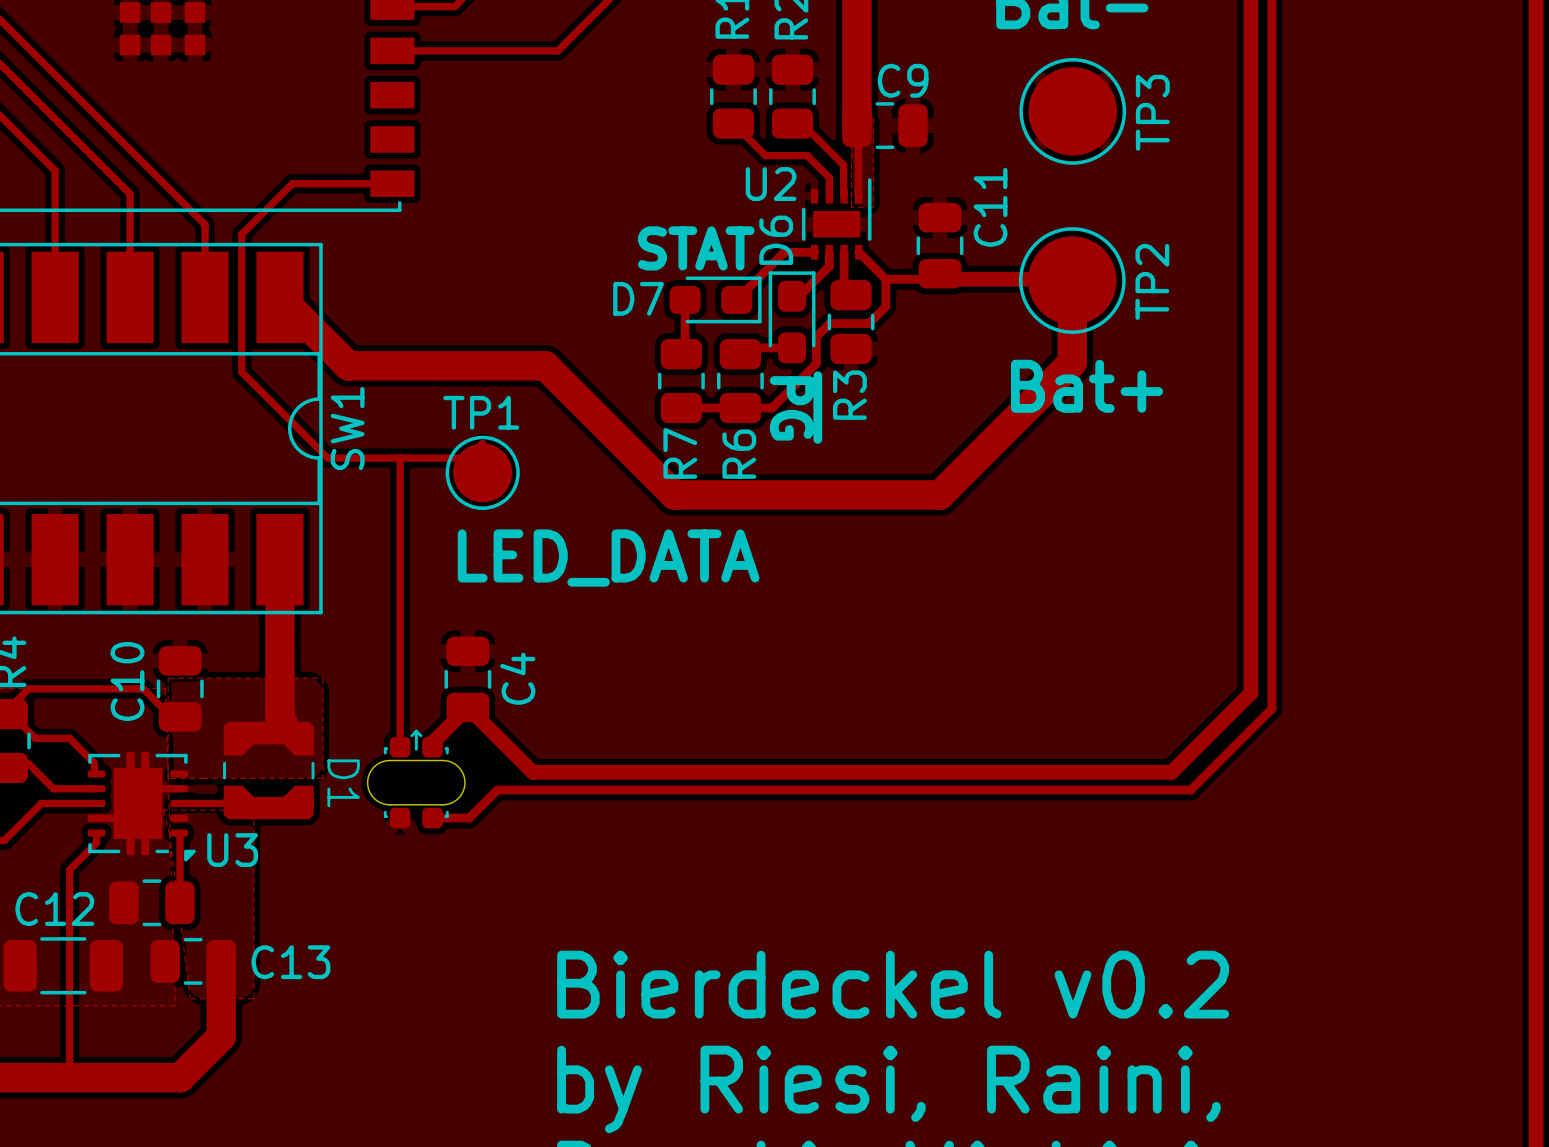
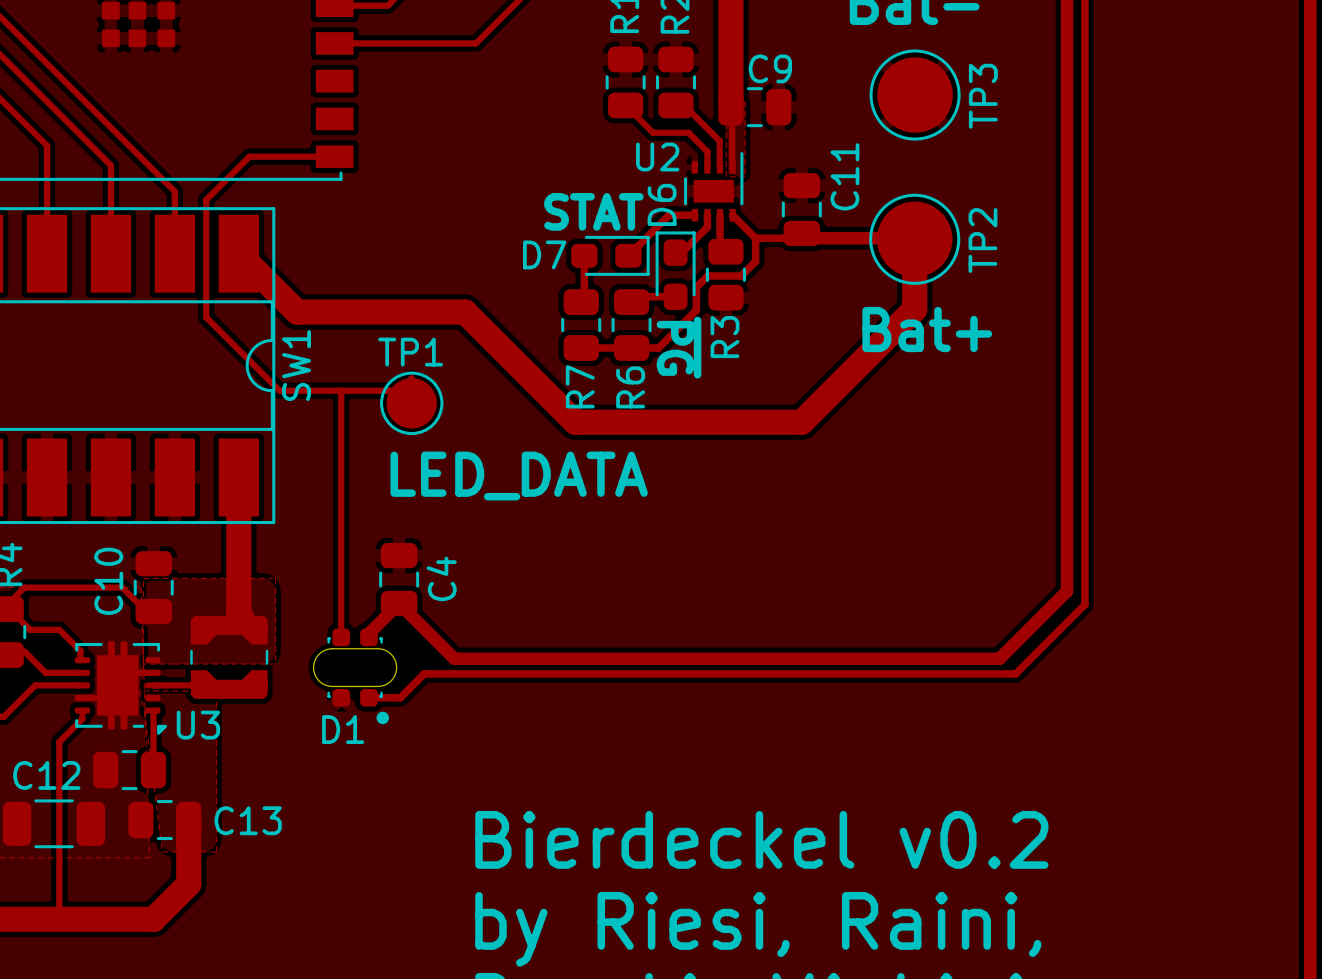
D1 footprint: [366, 736, 466, 829] -> [312, 628, 398, 725]
D1 name position: D1 (343, 783) -> D1 (343, 729)

